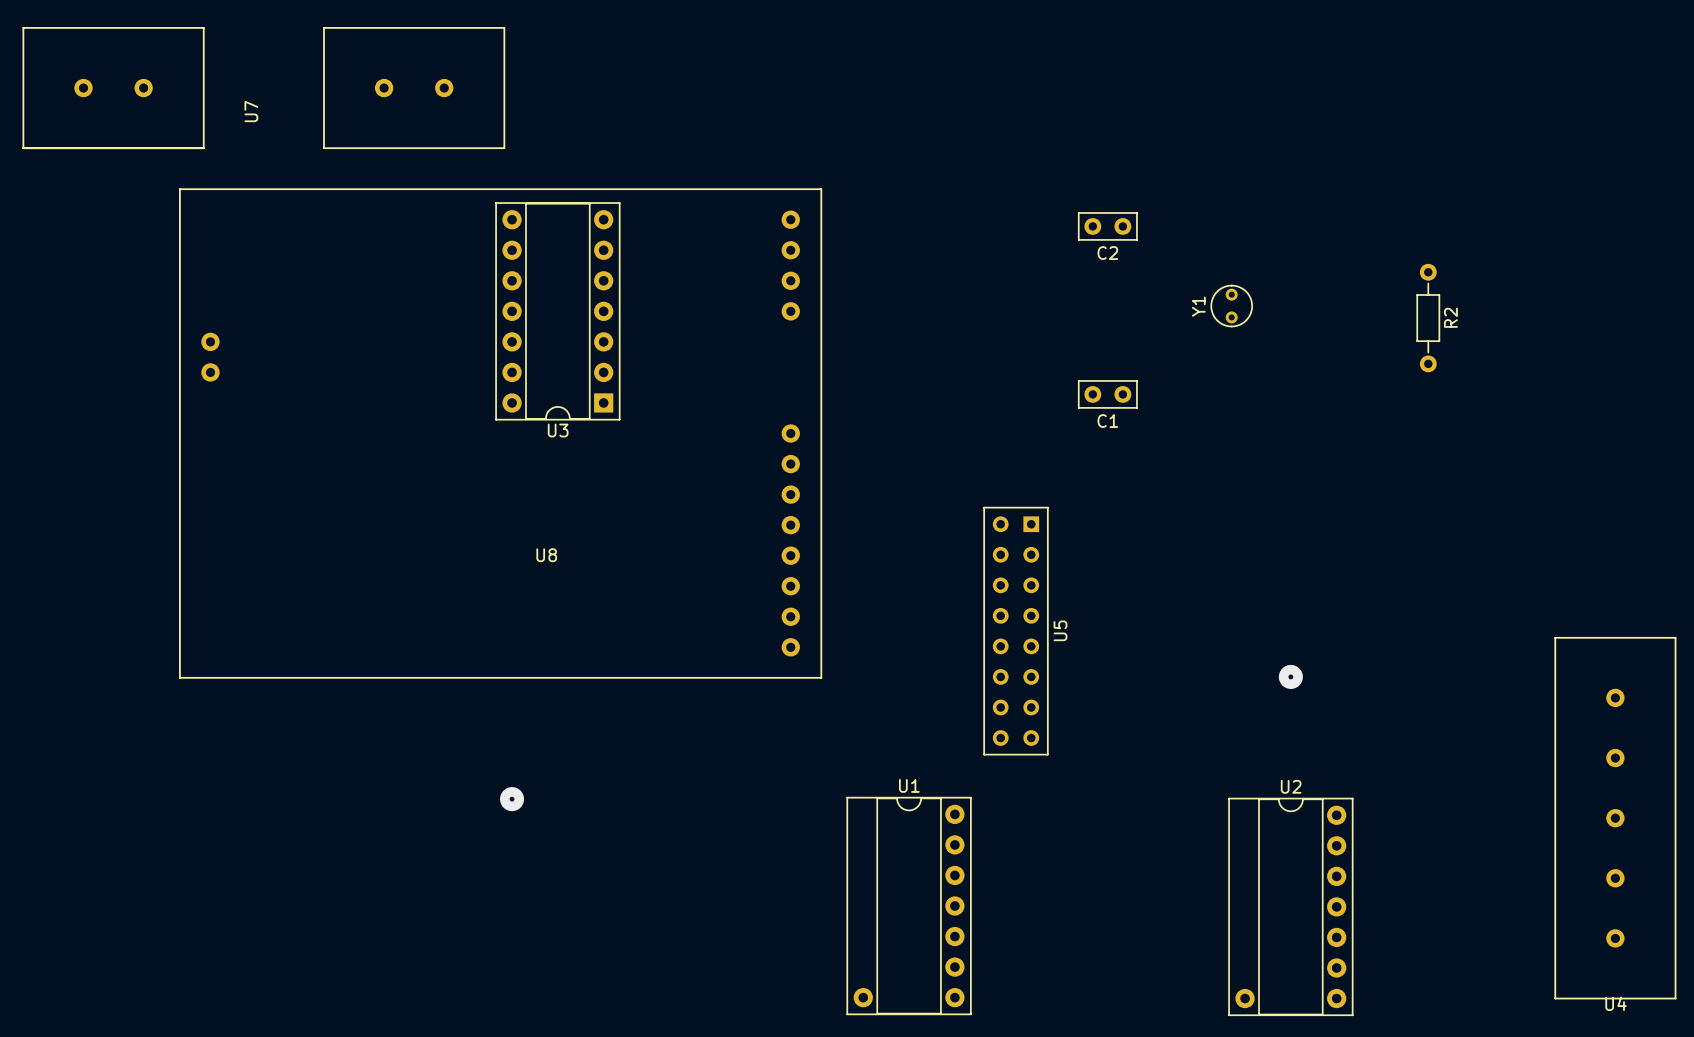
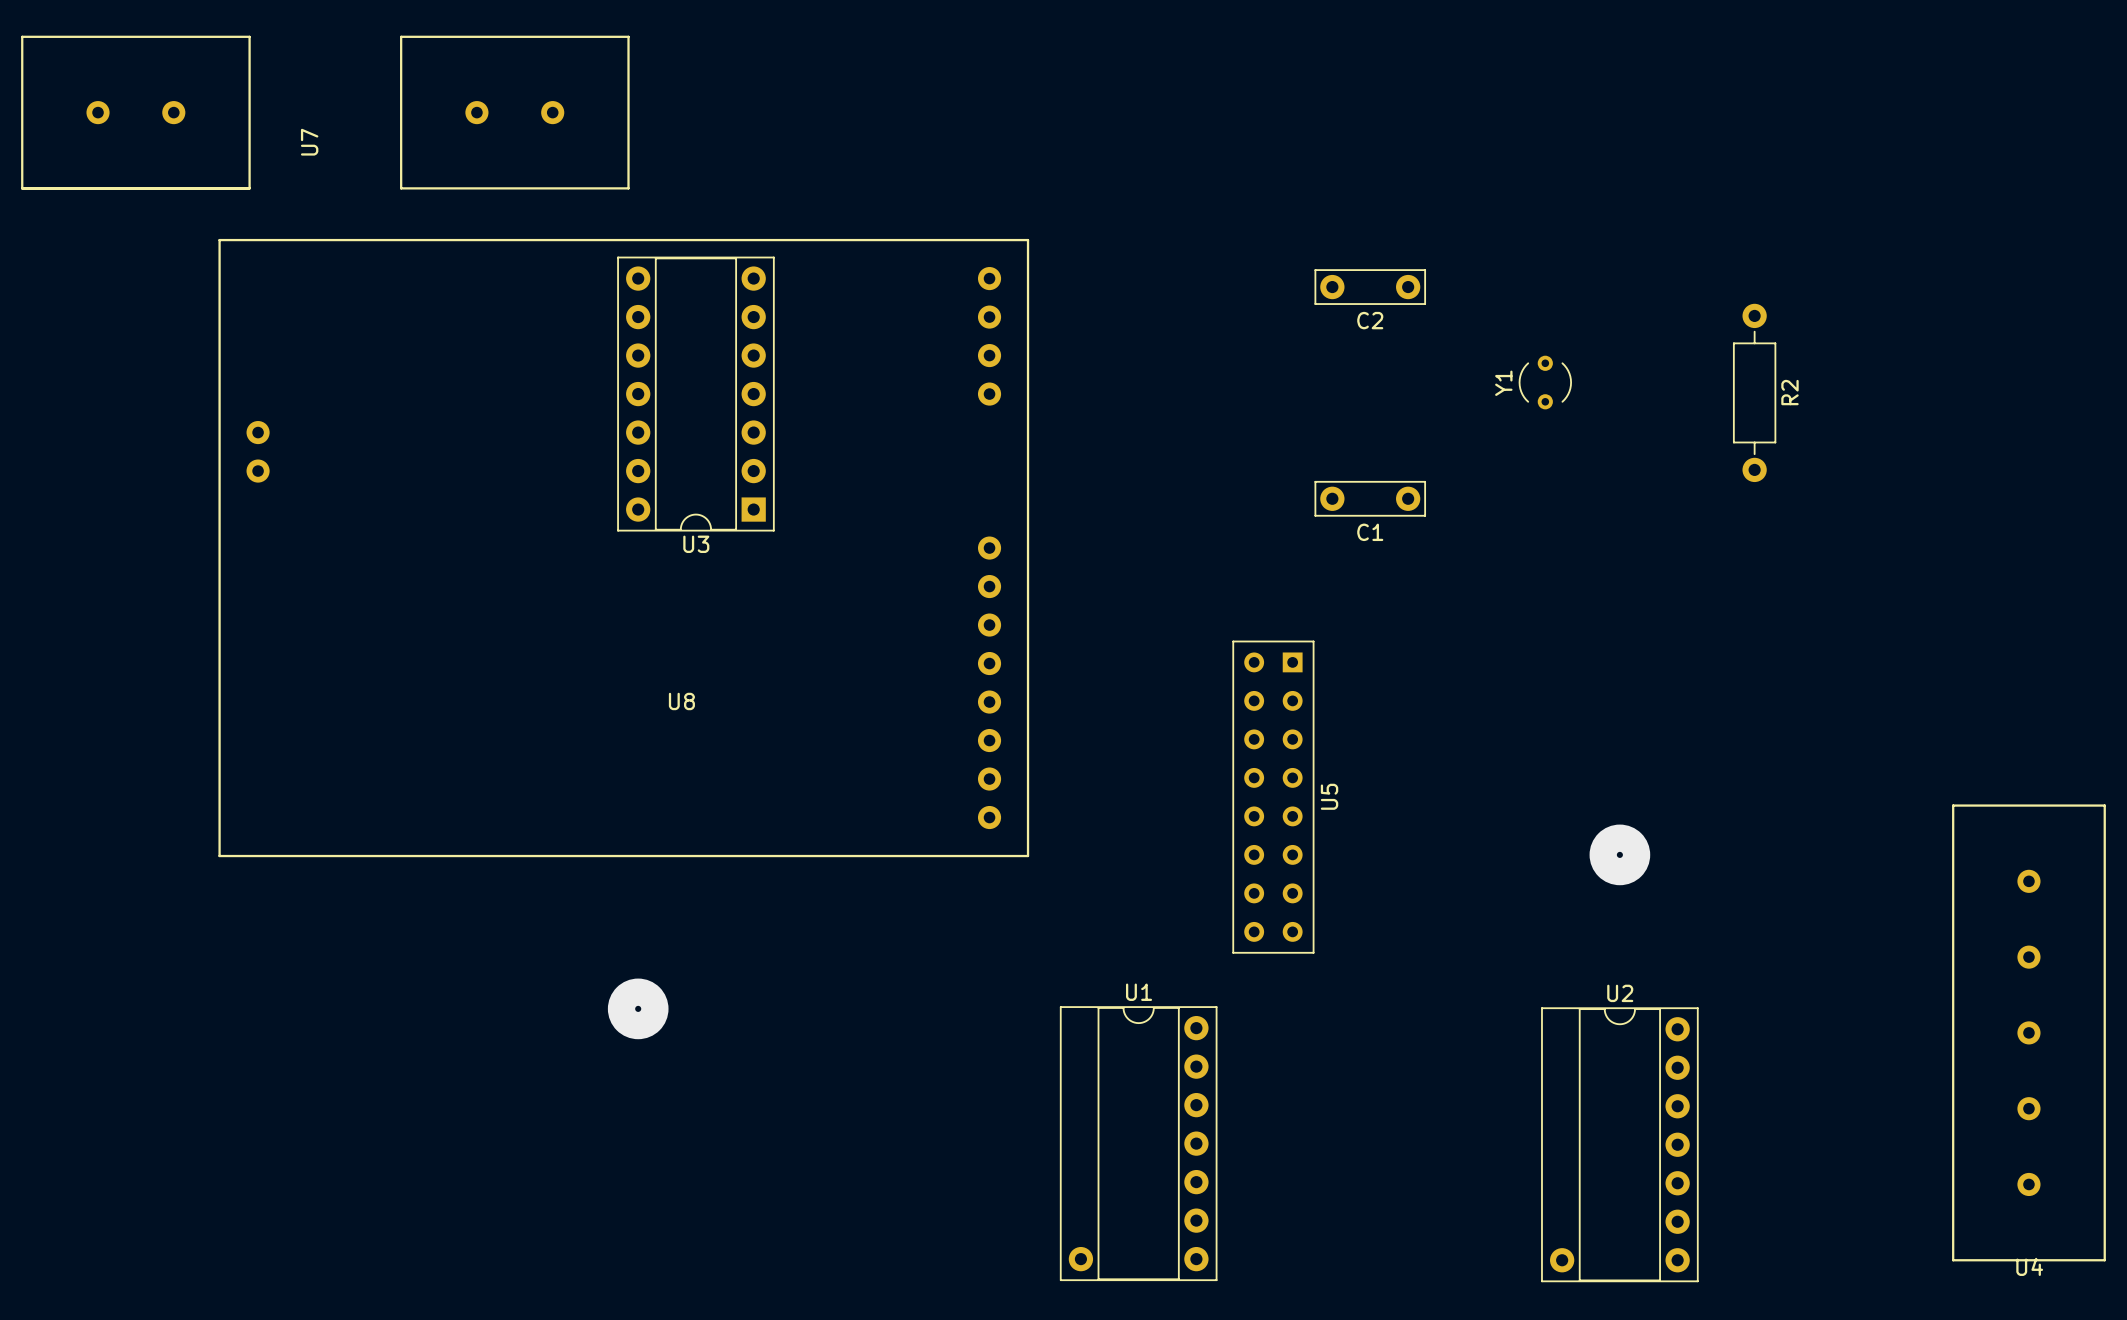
C2 footprint: [1078, 212, 1138, 241] -> [1314, 269, 1427, 305]
R2 footprint: [1416, 263, 1441, 373] -> [1732, 303, 1777, 483]
Y1 footprint: [1210, 284, 1253, 328] -> [1518, 355, 1572, 410]
C1 footprint: [1078, 380, 1138, 409] -> [1314, 480, 1427, 517]
via size: [1278, 664, 1303, 689] -> [1589, 824, 1651, 886]
via size: [500, 787, 525, 812] -> [607, 978, 669, 1040]

